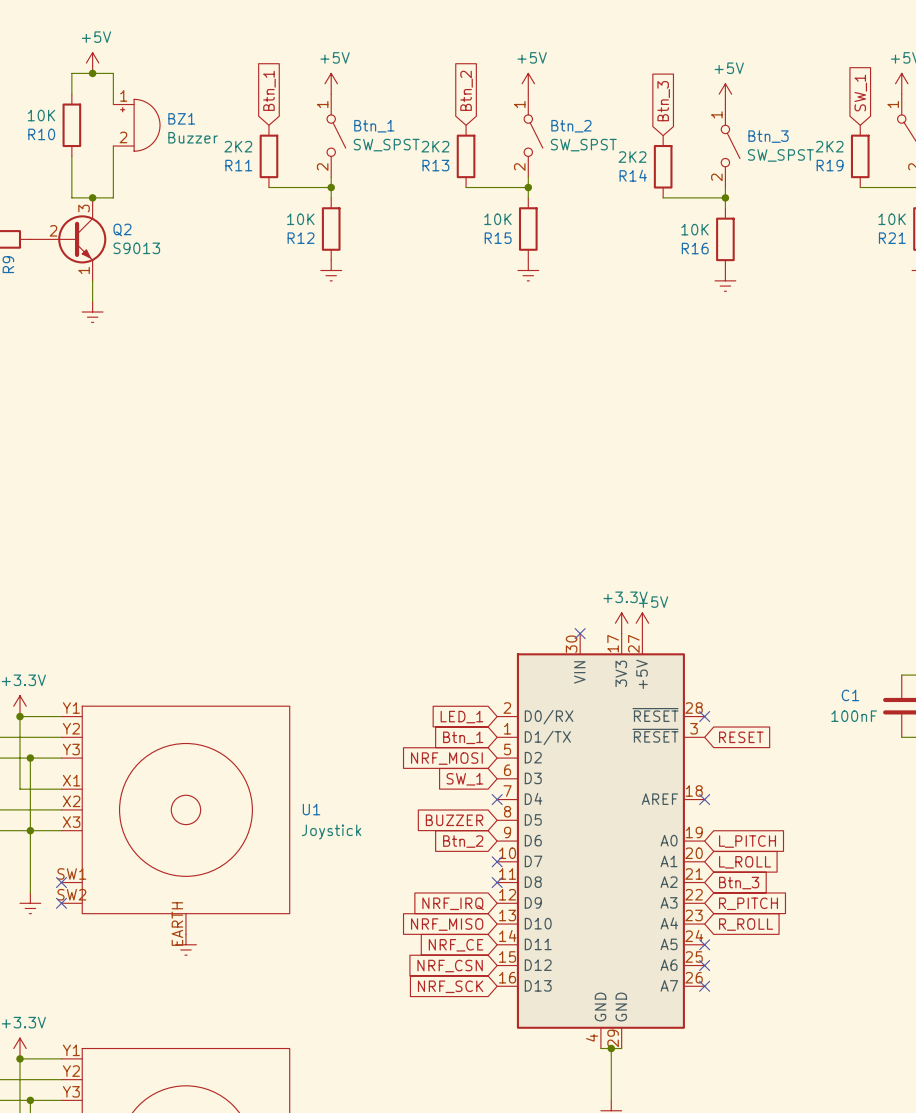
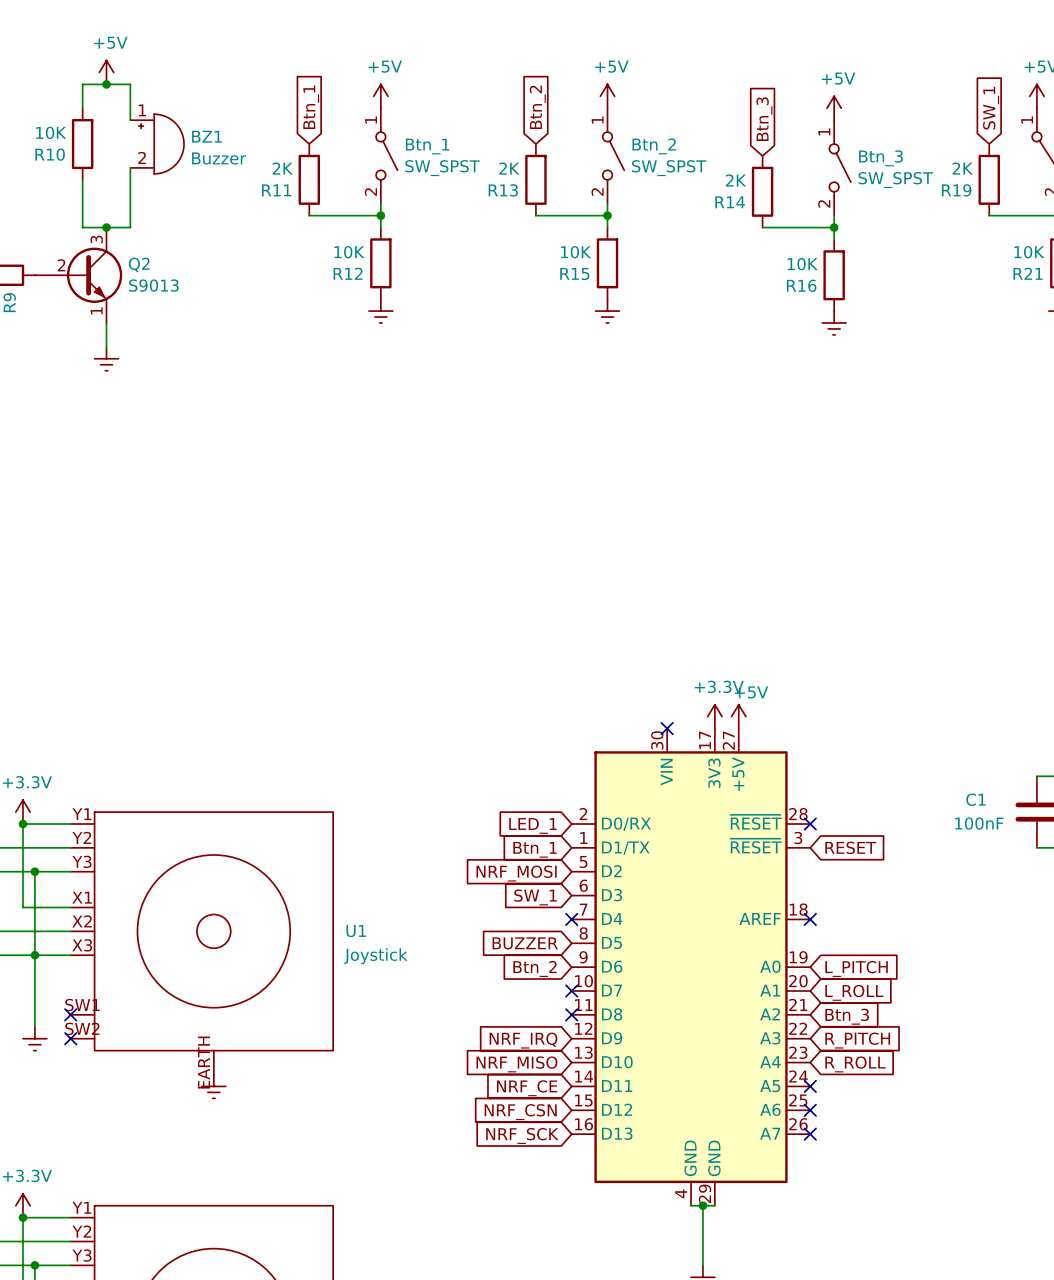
R11 value: 2K2 (238, 146) -> 2K (282, 168)
R13 value: 2K2 (435, 146) -> 2K (509, 168)
R19 value: 2K2 (829, 146) -> 2K (962, 168)
R14 value: 2K2 (632, 157) -> 2K (736, 180)

